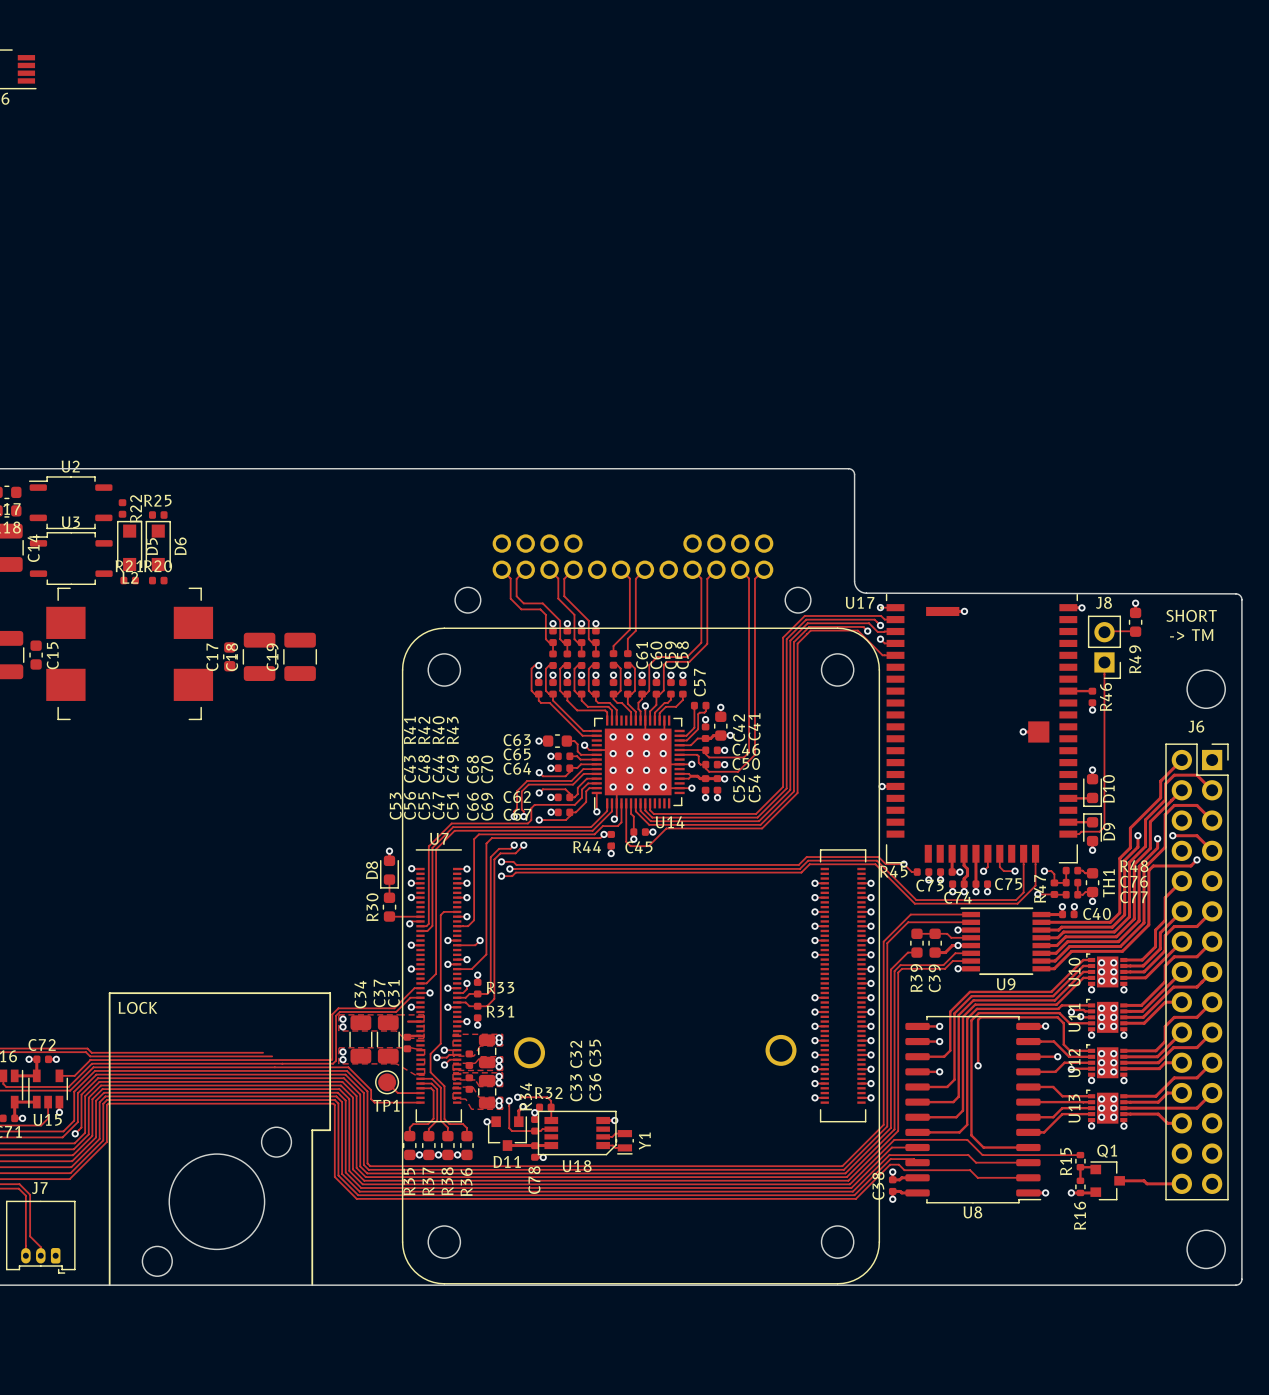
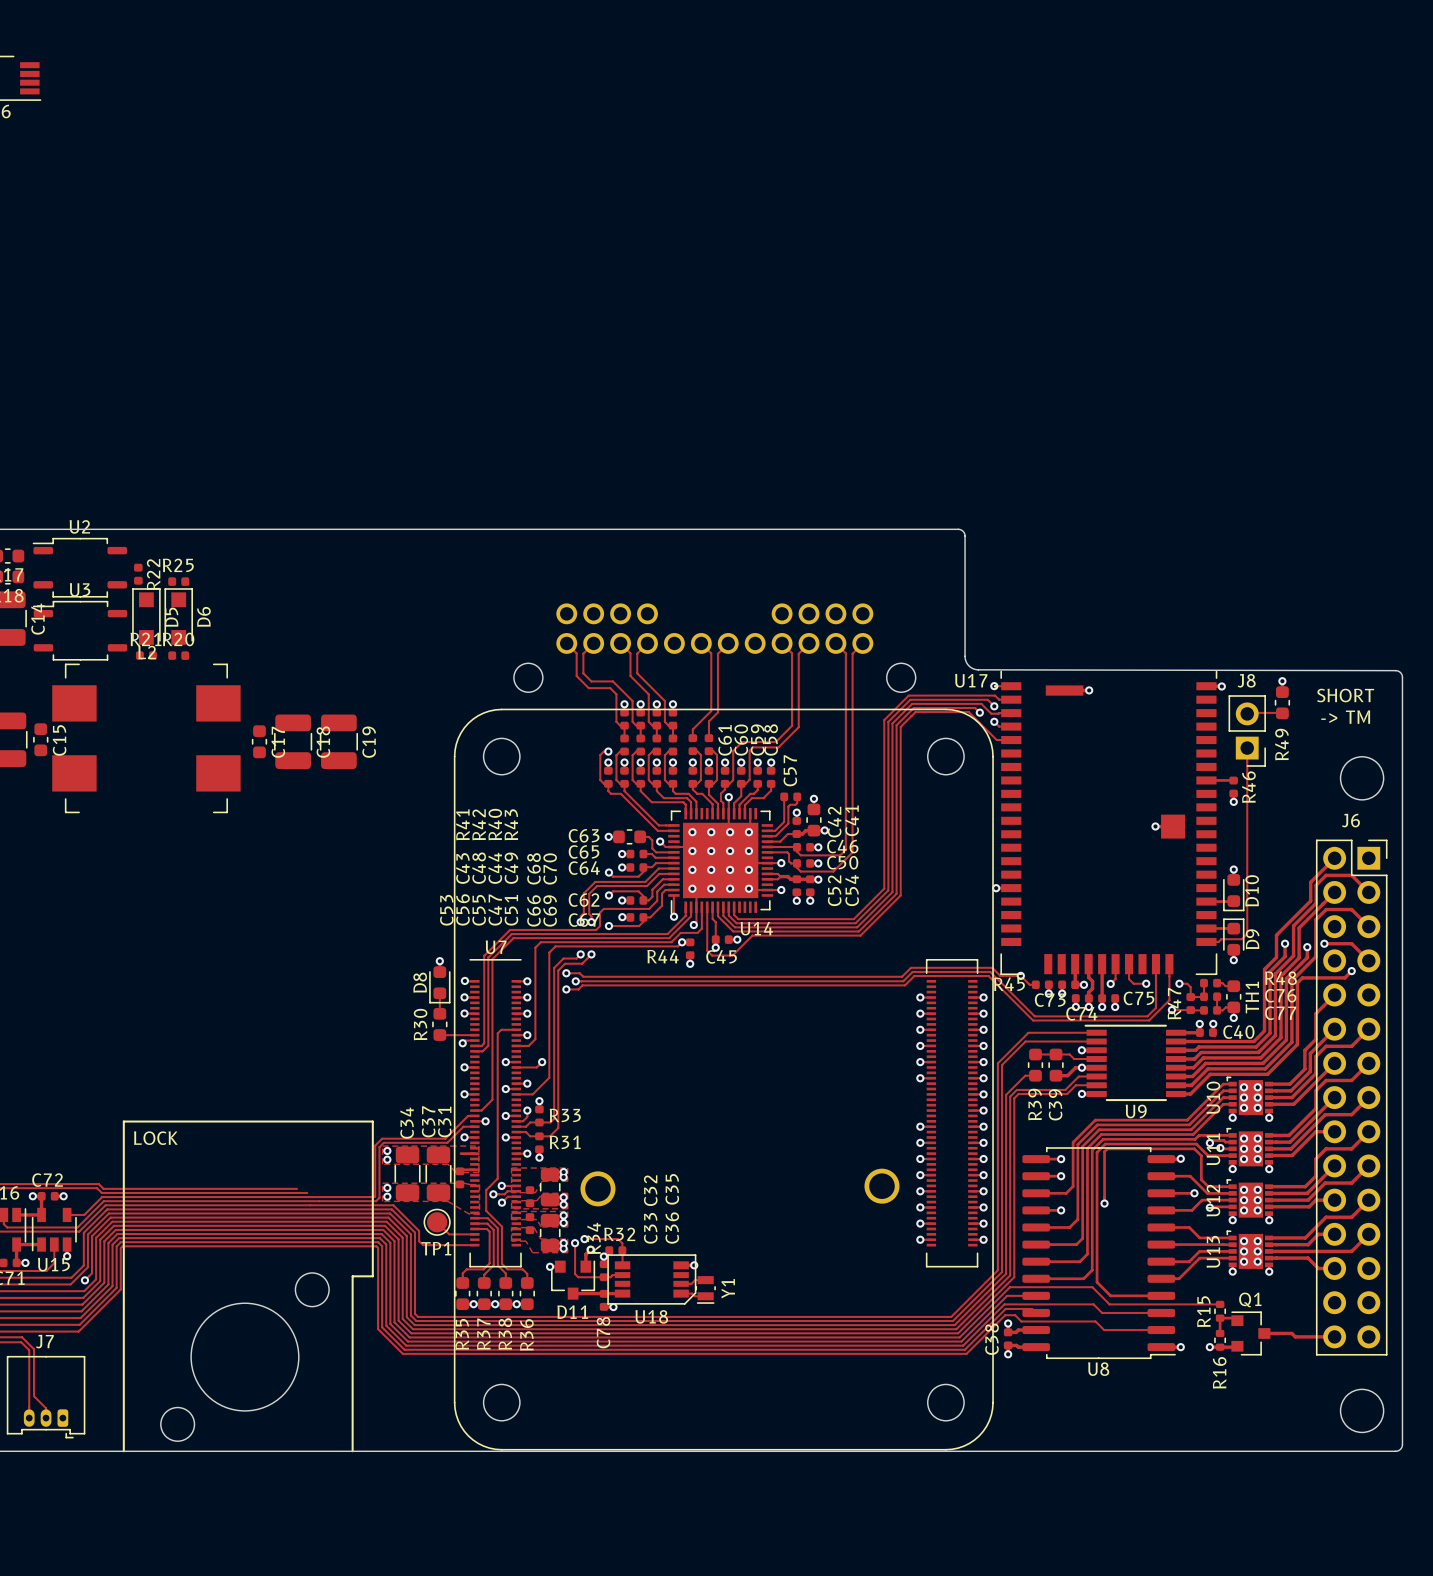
C17 name position: C17 (212, 657) -> C17 (278, 742)
C18 name position: C18 (232, 657) -> C18 (323, 742)
C19 name position: C19 (272, 657) -> C19 (369, 742)

